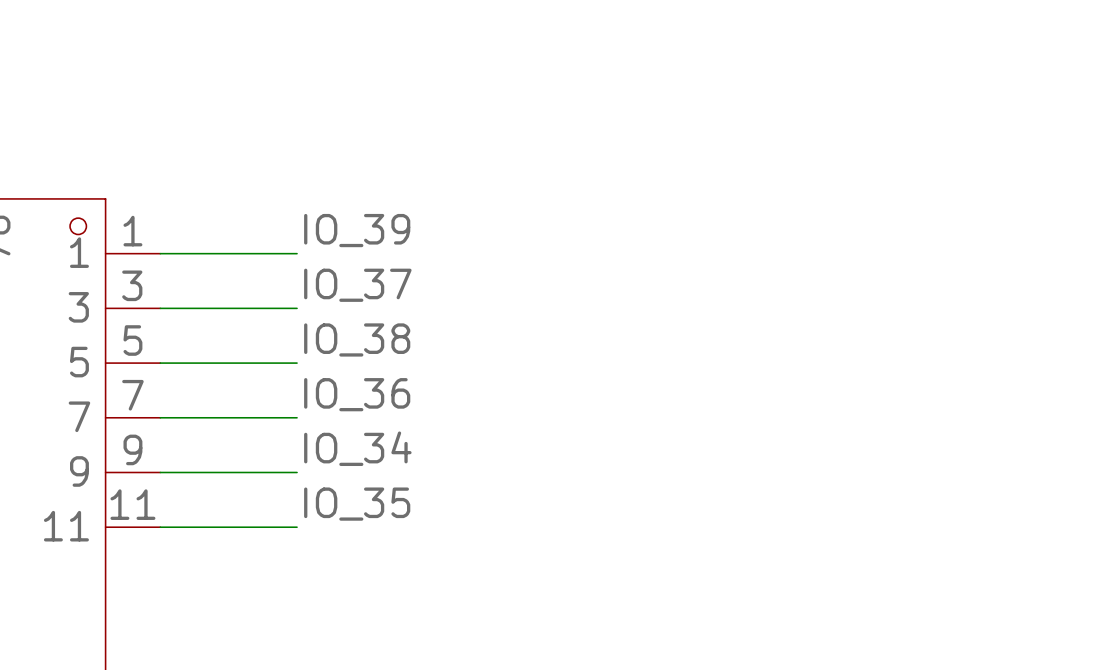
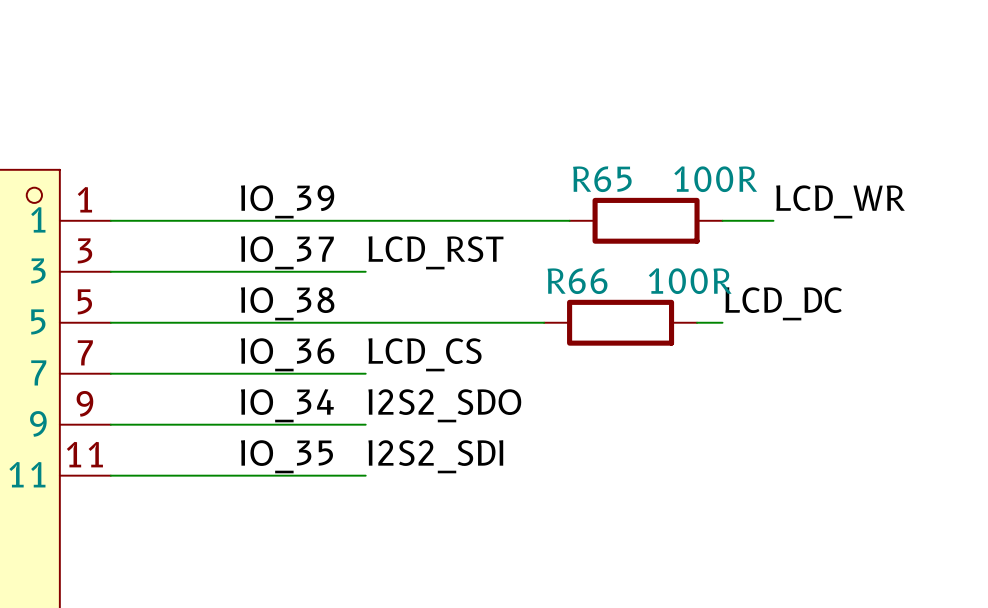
label: none -> LCD_WR (840, 201)
wire: none -> (238, 220) (569, 220)
R65: none -> 100R (646, 220)
wire: none -> (722, 220) (773, 220)
label: none -> LCD_RST (435, 252)
wire: none -> (238, 271) (365, 271)
label: none -> LCD_DC (783, 303)
wire: none -> (238, 322) (544, 322)
R66: none -> 100R (620, 322)
wire: none -> (697, 322) (722, 322)
label: none -> LCD_CS (424, 354)
wire: none -> (238, 373) (365, 373)
label: none -> I2S2_SDO (444, 405)
wire: none -> (238, 424) (365, 424)
label: none -> I2S2_SDI (435, 456)
wire: none -> (238, 475) (365, 475)

